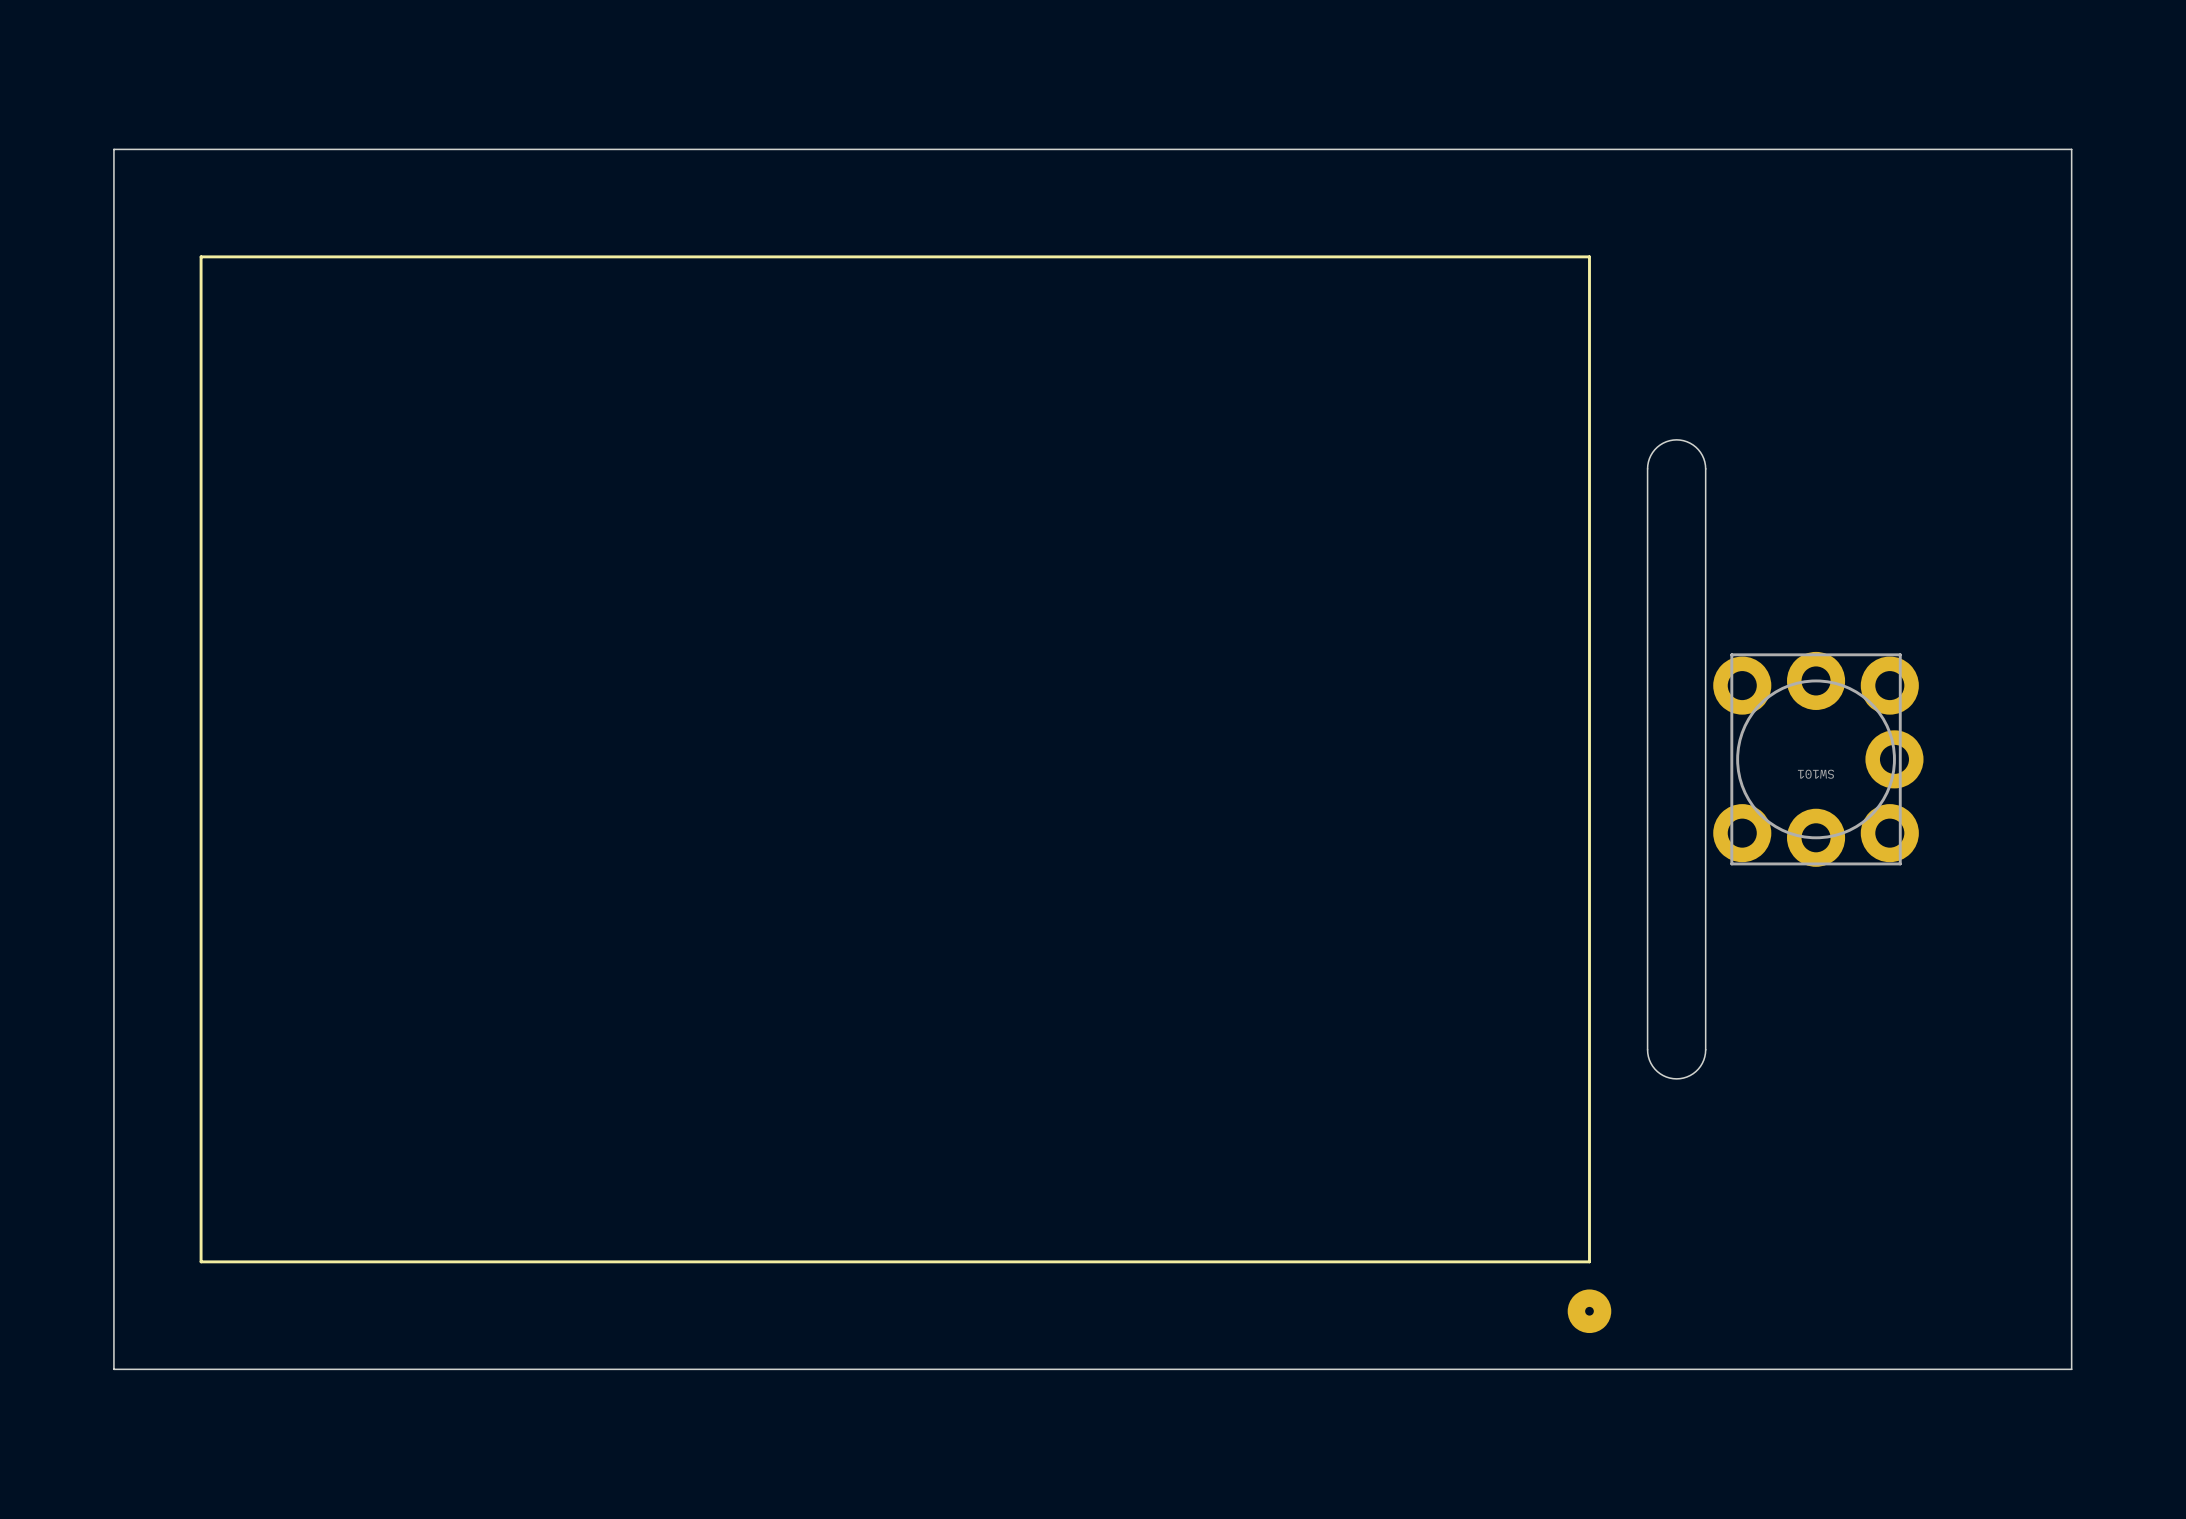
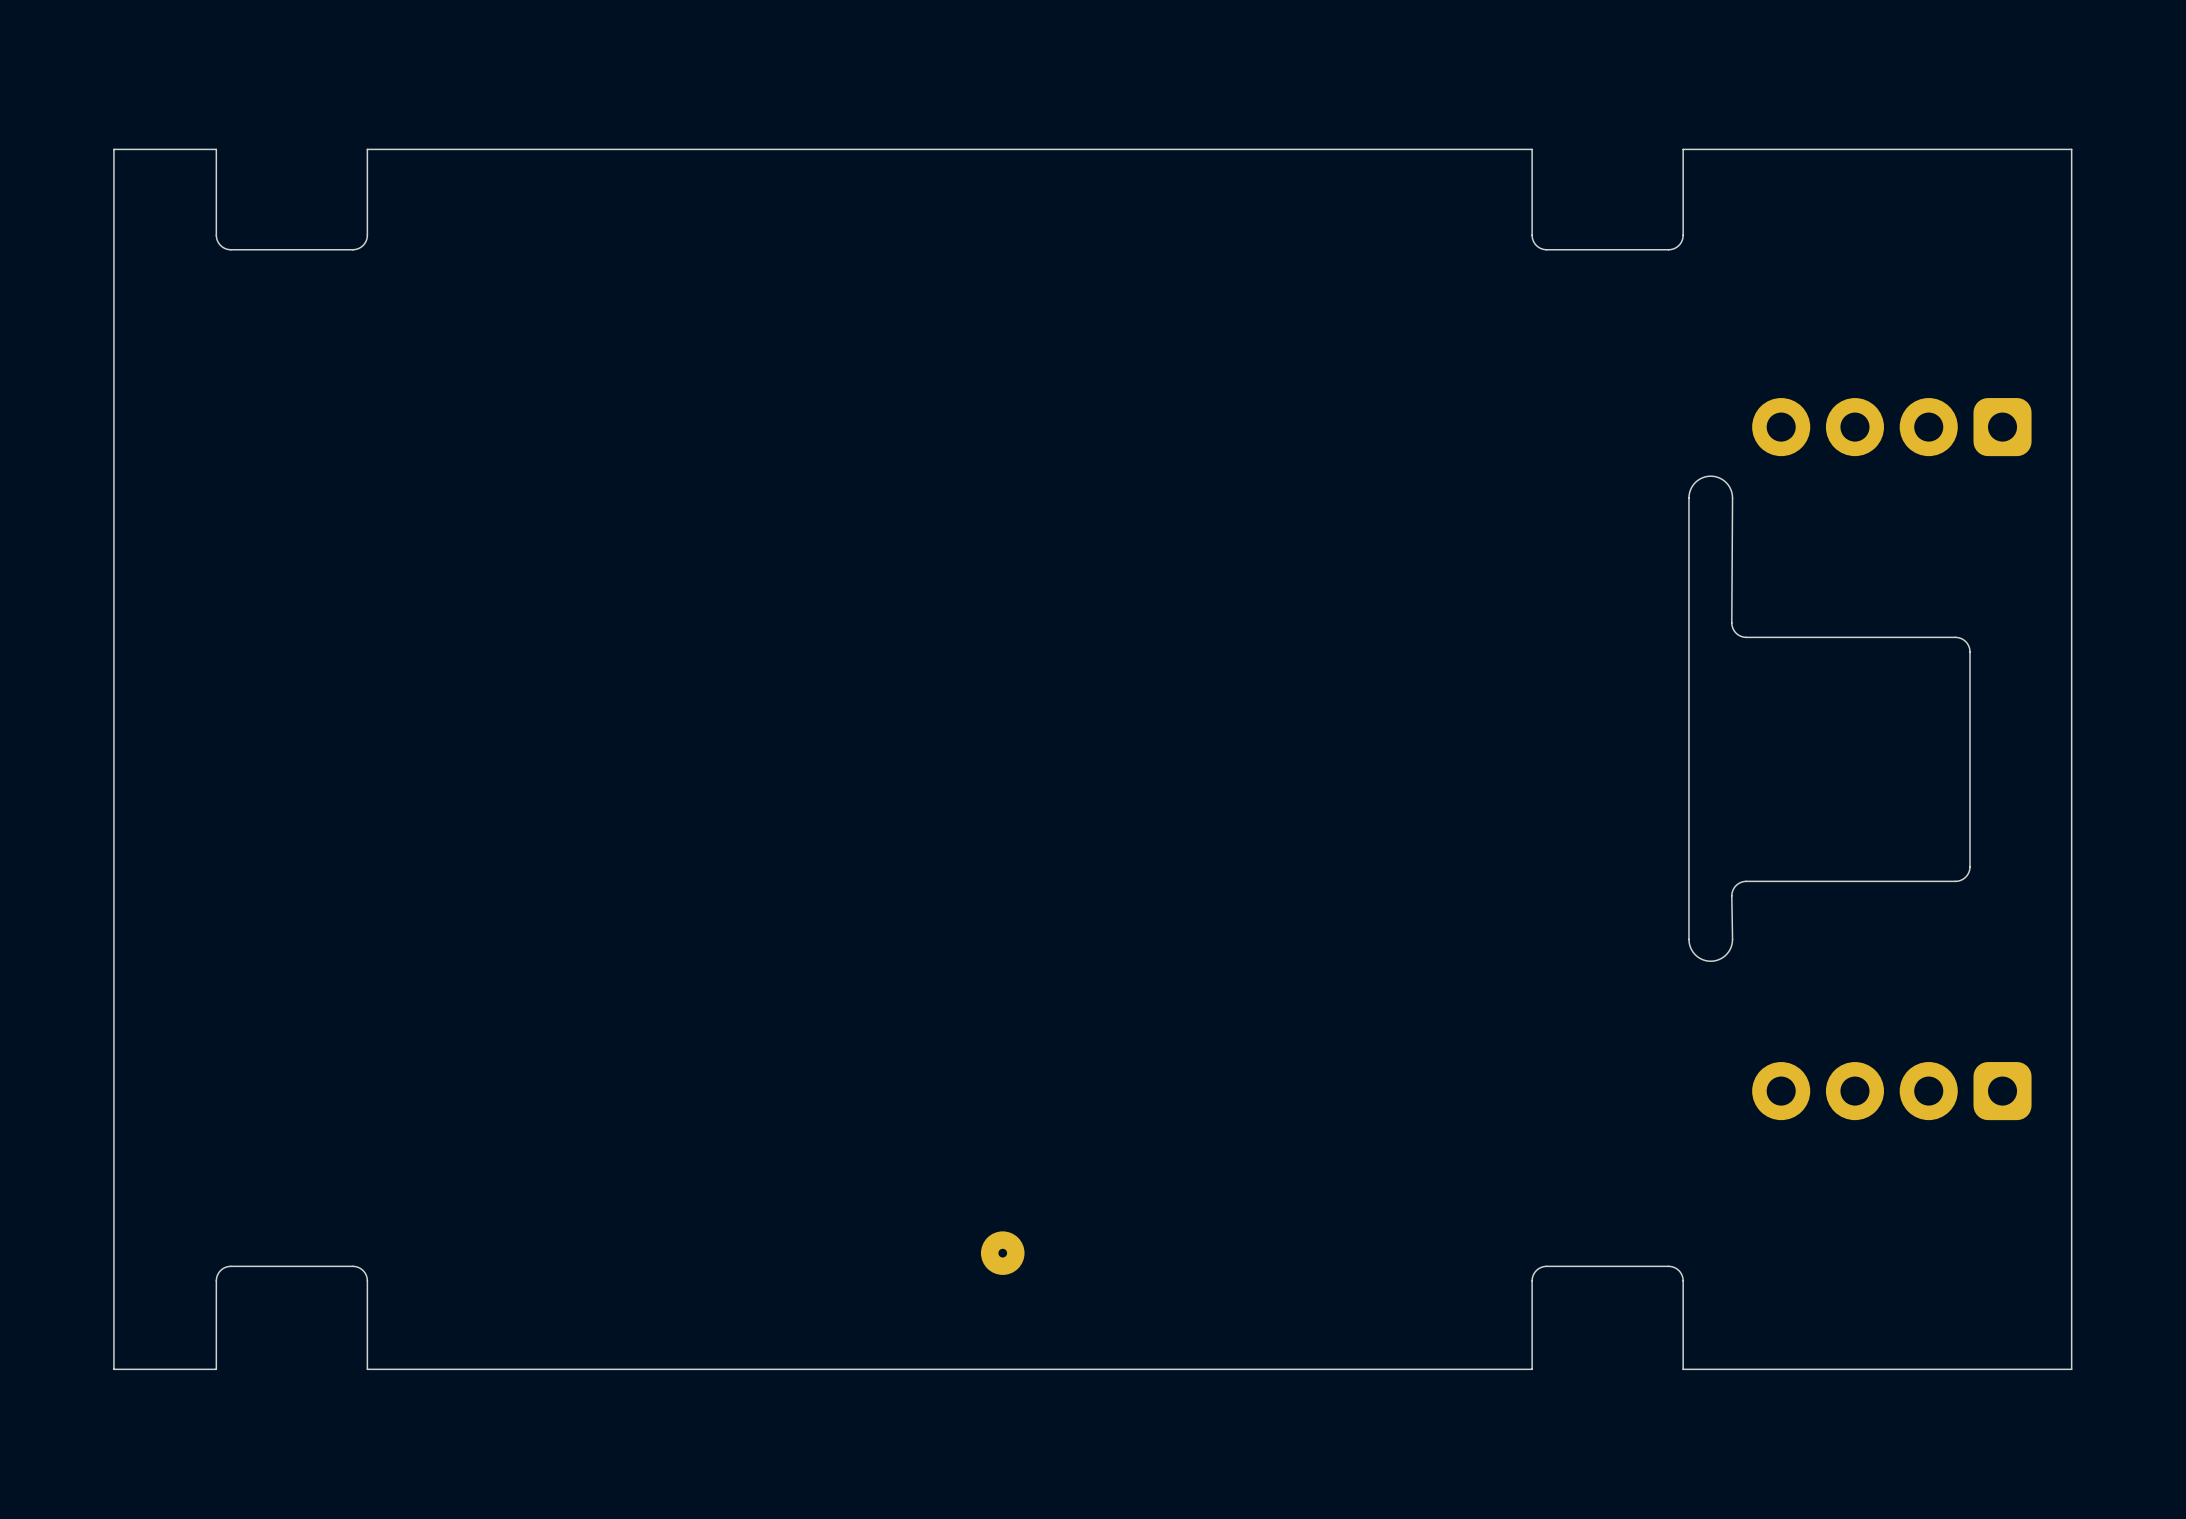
board edge: (367, 149) (216, 149) -> (367, 149) (367, 237) (363, 245) (352, 249) (230, 249) (222, 246) (216, 235) (216, 149)
board edge: (1683, 149) (1532, 149) -> (1683, 149) (1683, 236) (1677, 246) (1668, 249) (1546, 249) (1537, 246) (1532, 235) (1532, 149)
line: (1589, 256) (201, 256) (201, 1261) (1589, 1261) (1589, 256) -> none
part: none -> (1891, 427)
board edge: (1705, 468) (1705, 1049) (1703, 1060) (1698, 1069) (1686, 1076) (1676, 1078) (1666, 1076) (1657, 1071) (1649, 1060) (1647, 1049) (1647, 468) (1650, 455) (1657, 447) (1666, 441) (1676, 439) (1686, 441) (1695, 447) (1702, 455) (1705, 468) -> none
board edge: none -> (1732, 497) (1731, 622) (1733, 630) (1739, 635) (1746, 637) (1955, 637) (1962, 639) (1968, 644) (1969, 651) (1969, 866) (1965, 877) (1957, 881) (1740, 882) (1734, 887) (1731, 893) (1731, 947) (1723, 957) (1710, 961) (1703, 959) (1694, 953) (1688, 939) (1688, 497) (1690, 489) (1695, 482) (1702, 477) (1710, 476) (1719, 477) (1726, 482) (1730, 489) (1732, 497)
SW101: (1818, 759) -> none
part: none -> (1891, 1091)
part position: (1589, 1311) -> (1002, 1253)
board edge: (367, 1369) (216, 1369) -> (367, 1369) (367, 1278) (361, 1269) (352, 1266) (230, 1266) (222, 1269) (216, 1280) (216, 1369)
board edge: (1683, 1369) (1532, 1369) -> (1683, 1369) (1683, 1278) (1678, 1270) (1668, 1266) (1546, 1266) (1537, 1269) (1532, 1280) (1532, 1369)

